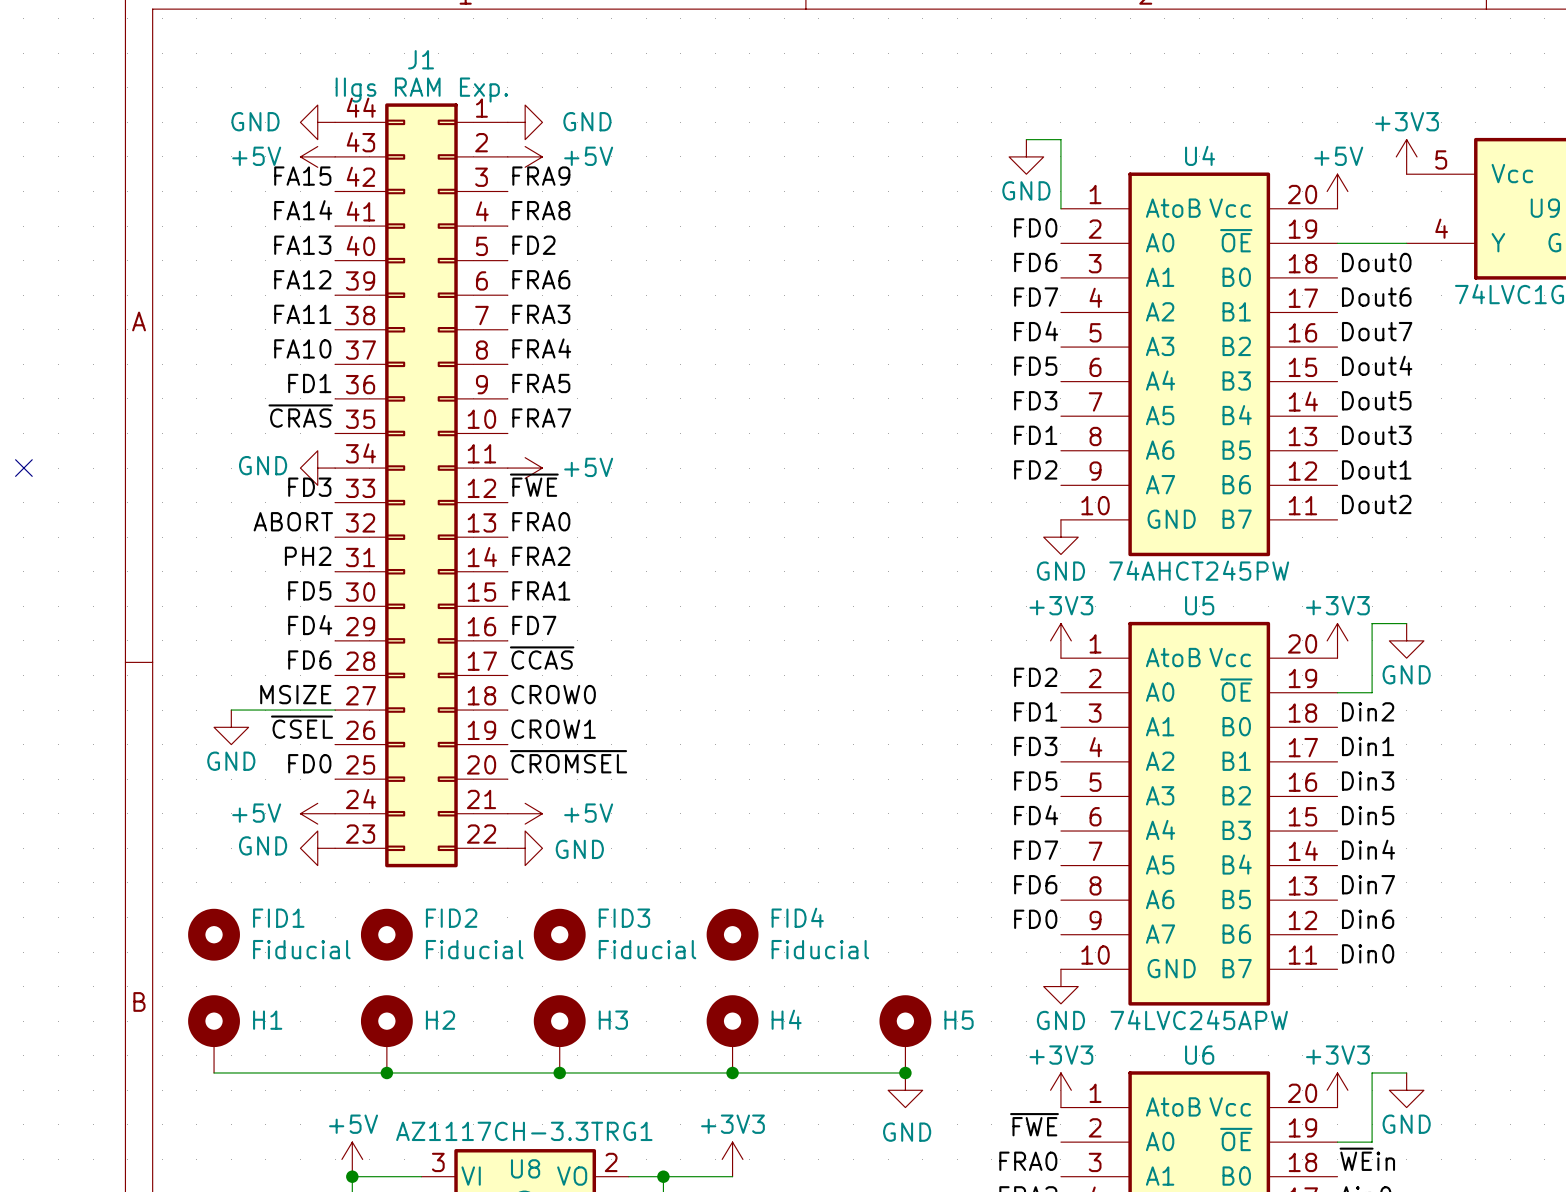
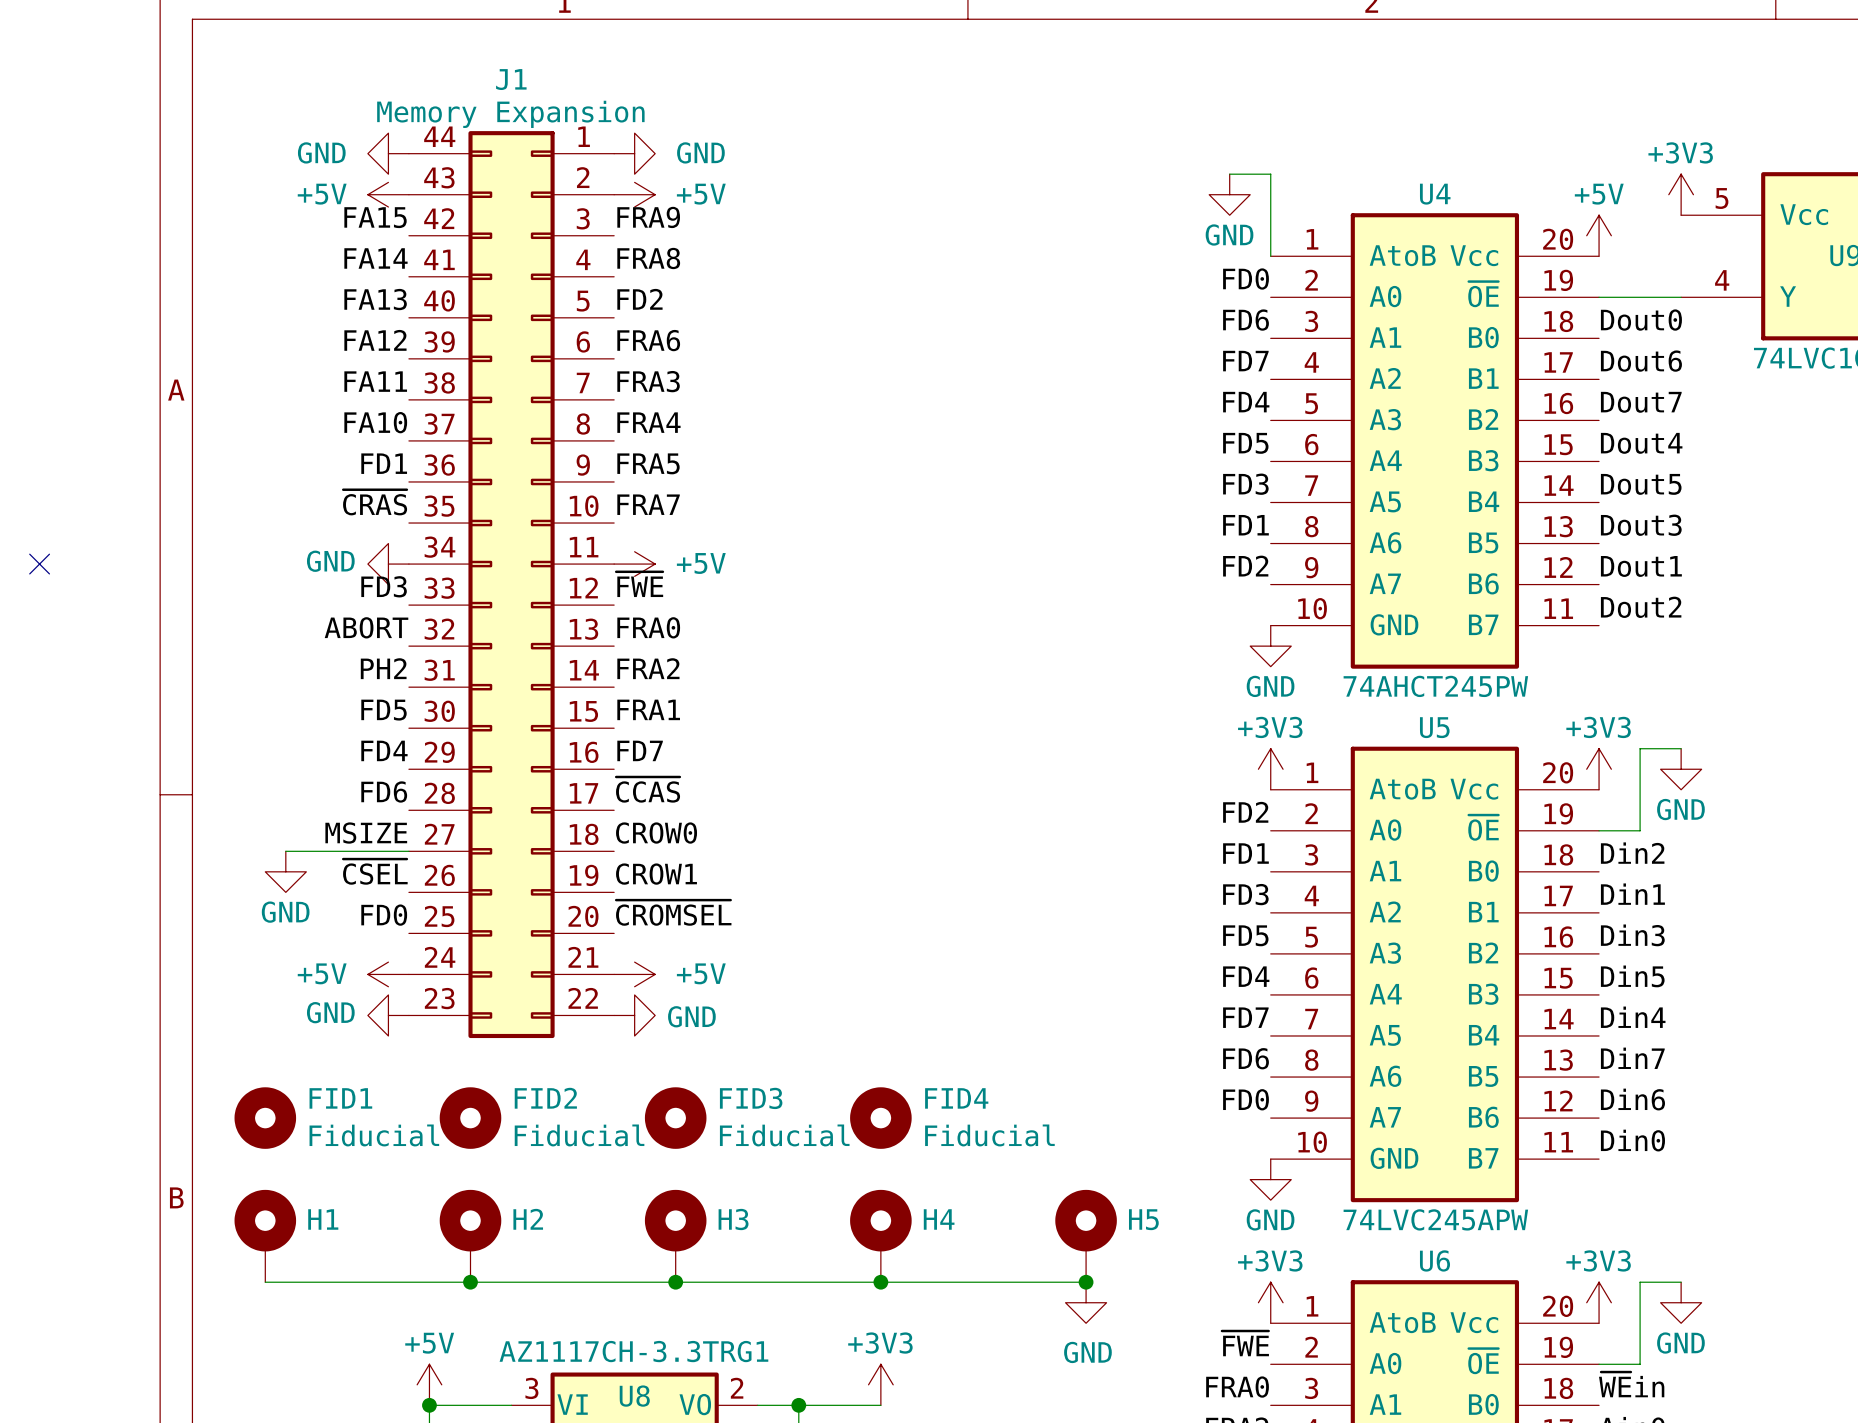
J1 value: IIgs RAM Exp. (421, 90) -> Memory Expansion (510, 114)

